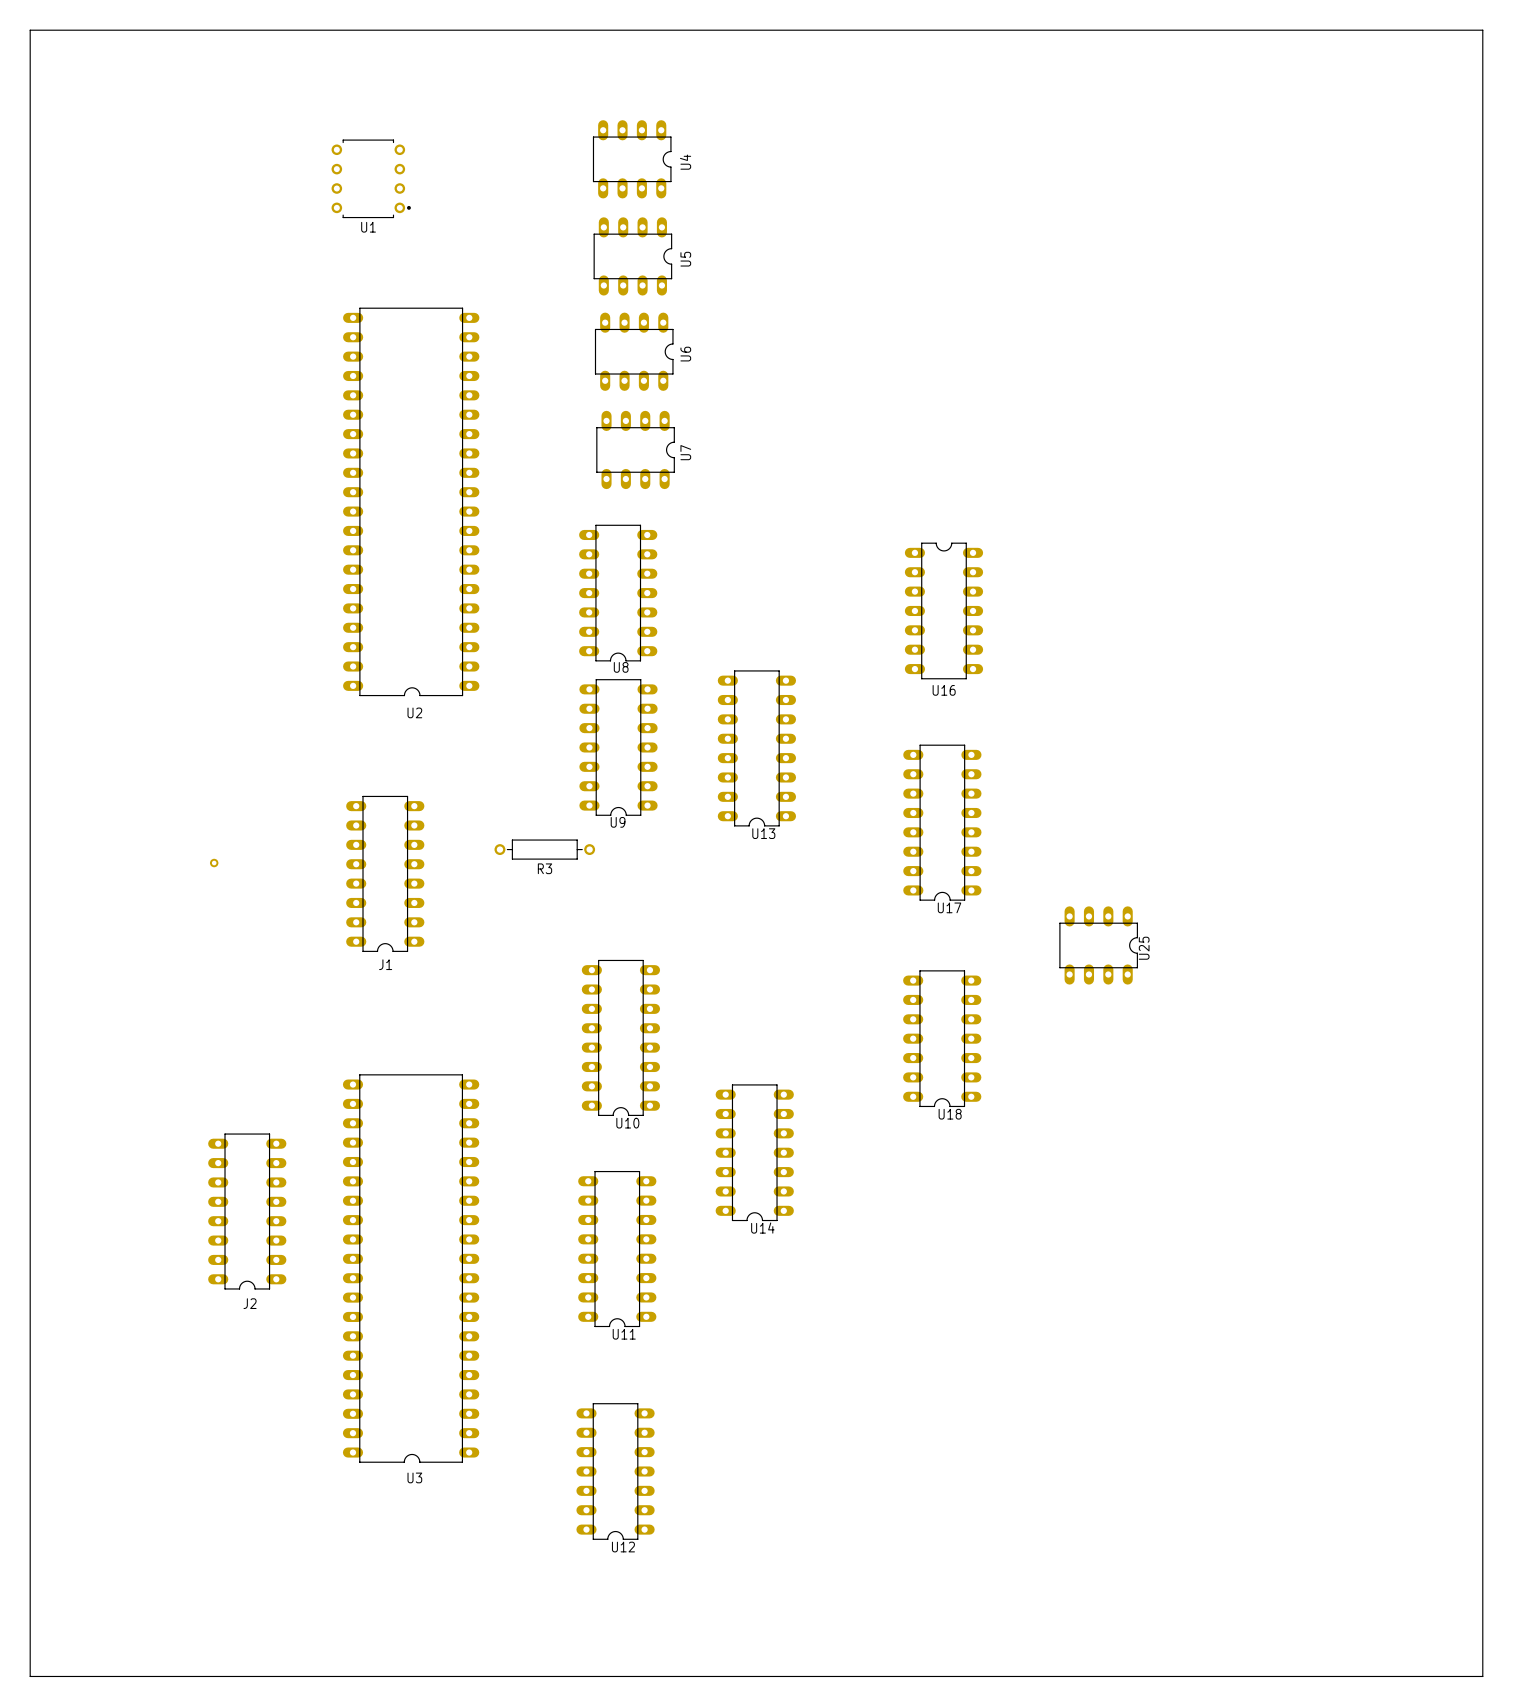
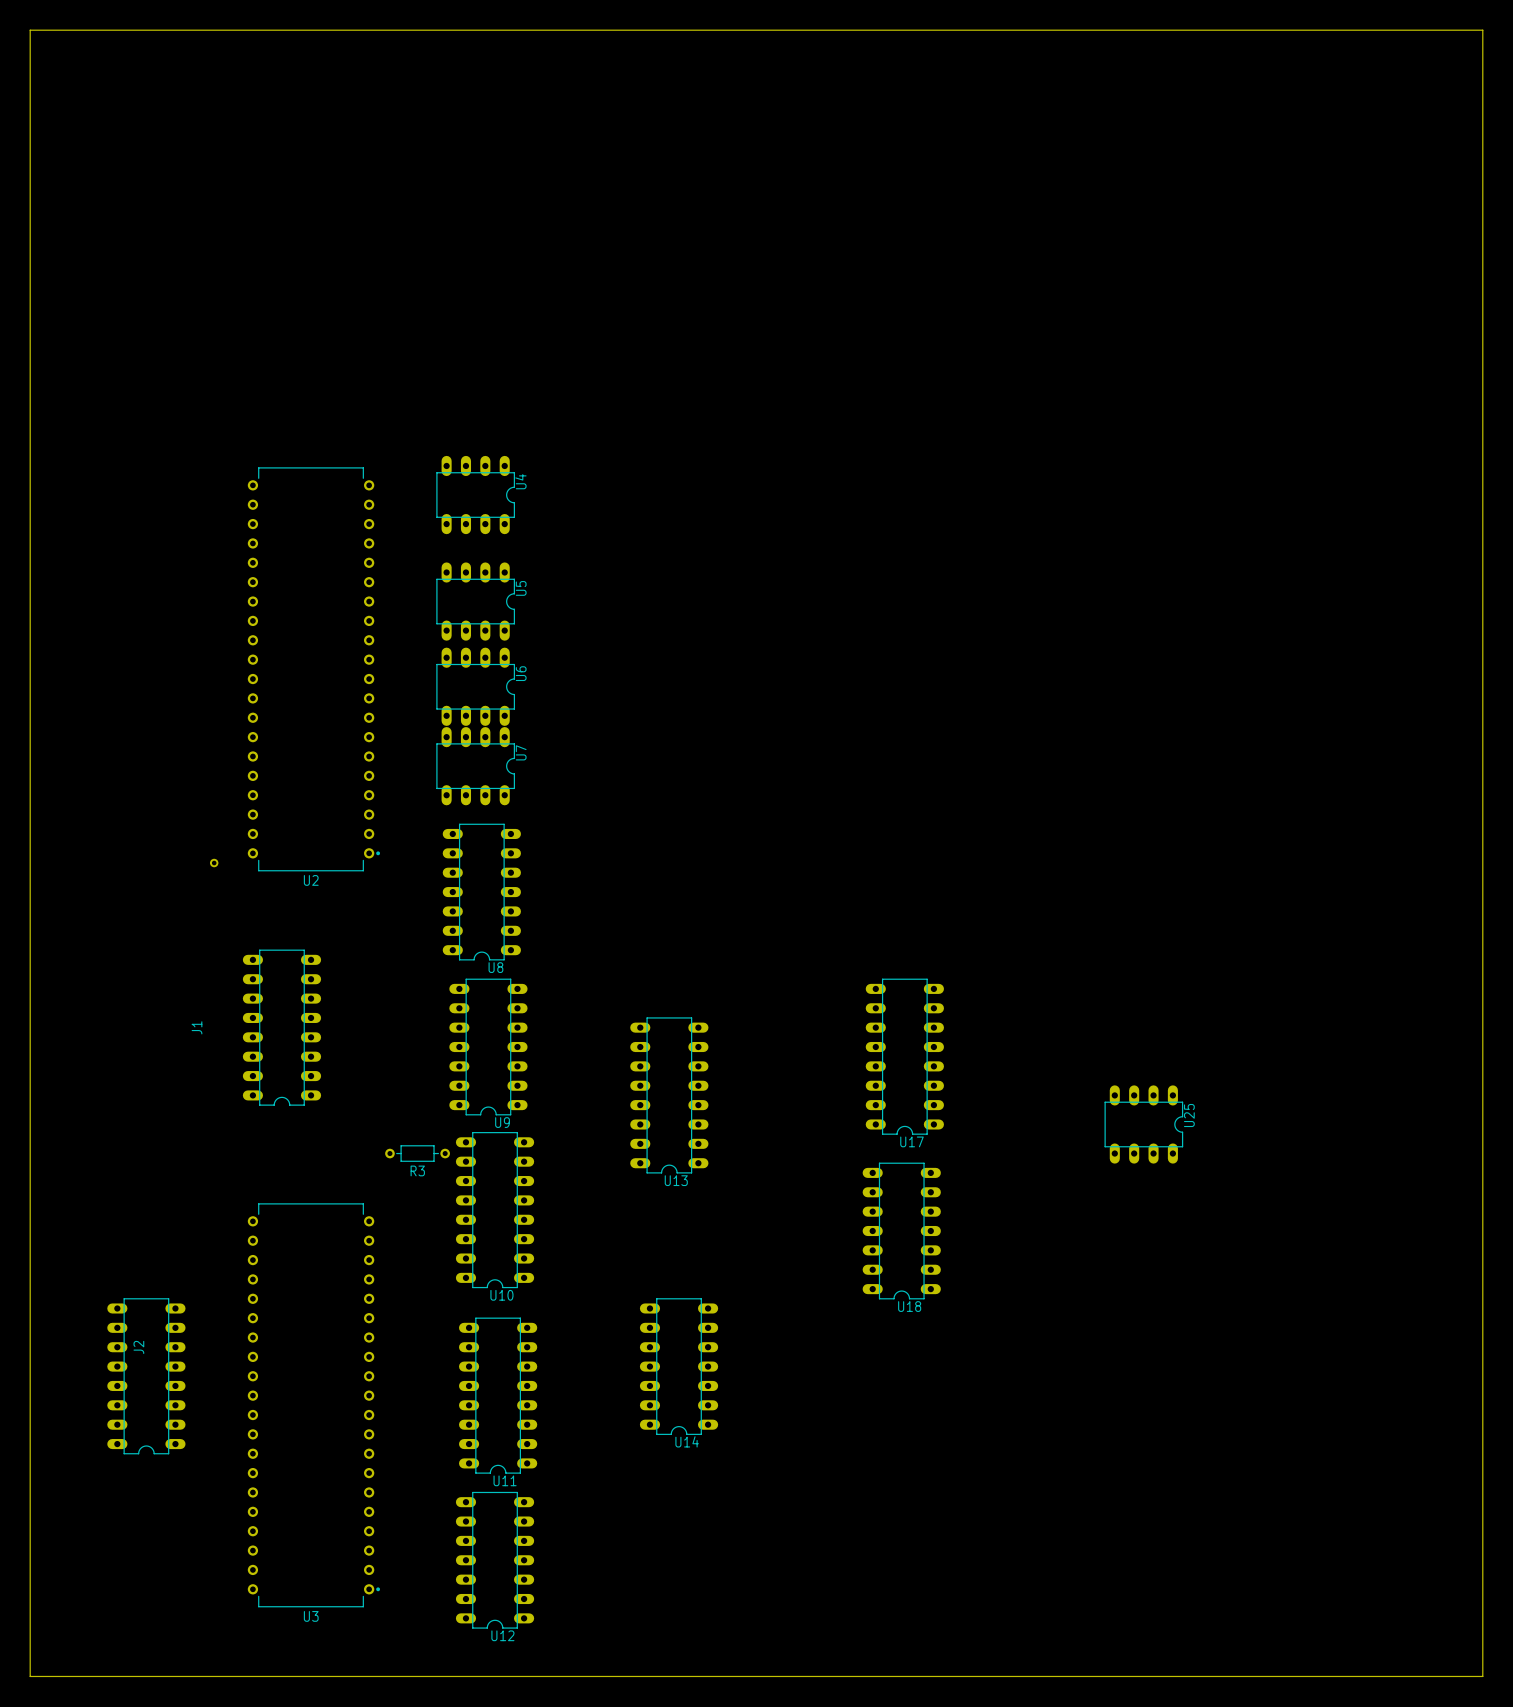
U4 position: (632, 159) -> (475, 495)
U4 name position: U4 (685, 162) -> U4 (520, 481)
U1: (371, 178) -> none
U5 position: (632, 256) -> (475, 601)
U5 name position: U5 (685, 259) -> U5 (521, 588)
U2 footprint: [343, 307, 480, 697] -> [247, 467, 381, 872]
U6 position: (634, 351) -> (475, 686)
U6 name position: U6 (685, 354) -> U6 (521, 673)
U7 position: (635, 449) -> (475, 766)
U7 name position: U7 (685, 452) -> U7 (521, 752)
U8 position: (618, 593) -> (481, 892)
U16: (943, 610) -> none
U8 name position: U8 (621, 667) -> U8 (495, 967)
U9 position: (618, 747) -> (488, 1047)
U13 position: (756, 748) -> (669, 1095)
U9 name position: U9 (618, 822) -> U9 (502, 1122)
U17 position: (942, 822) -> (904, 1056)
R3 footprint: [494, 839, 596, 860] -> [385, 1145, 450, 1162]
J1 position: (385, 873) -> (281, 1027)
U25 position: (1098, 945) -> (1143, 1124)
U25 name position: U25 (1144, 948) -> U25 (1189, 1115)
J1 name rotation: 0° (385, 964) -> 90° counterclockwise (196, 1027)
J1 name position: J1 (385, 964) -> J1 (196, 1027)
U10 position: (620, 1037) -> (495, 1210)
U18 position: (942, 1038) -> (901, 1231)
U3 footprint: [342, 1074, 480, 1463] -> [247, 1203, 381, 1608]
U14 position: (754, 1152) -> (679, 1366)
J2 position: (247, 1211) -> (146, 1376)
U11 position: (617, 1249) -> (498, 1395)
J2 name rotation: 0° (250, 1303) -> 90° counterclockwise (138, 1347)
J2 name position: J2 (250, 1303) -> J2 (138, 1347)
U12 position: (615, 1471) -> (495, 1560)

